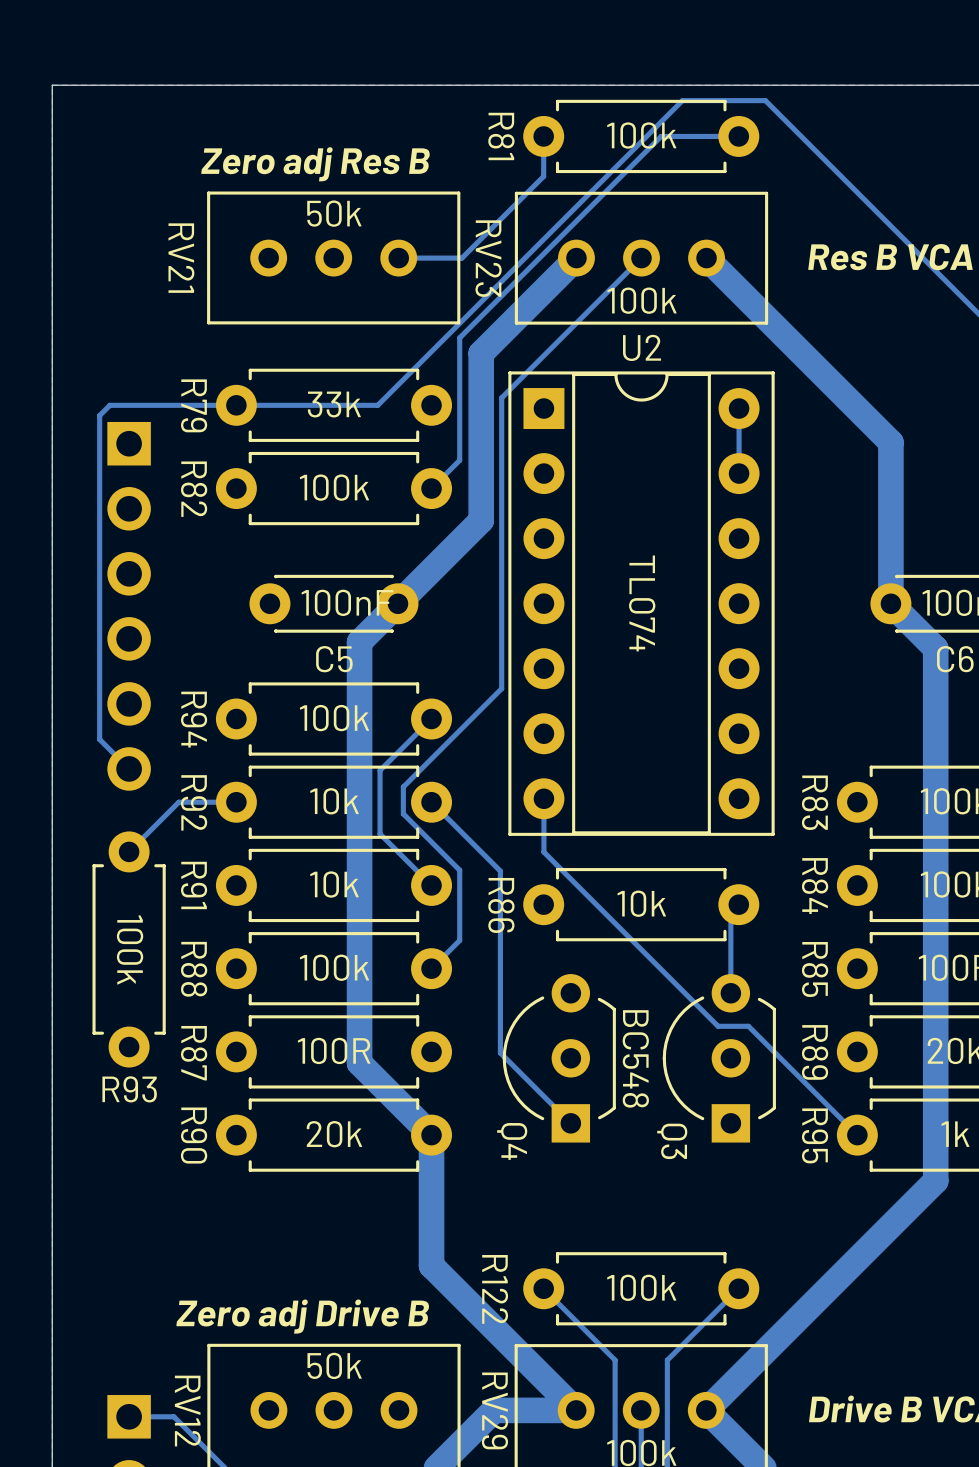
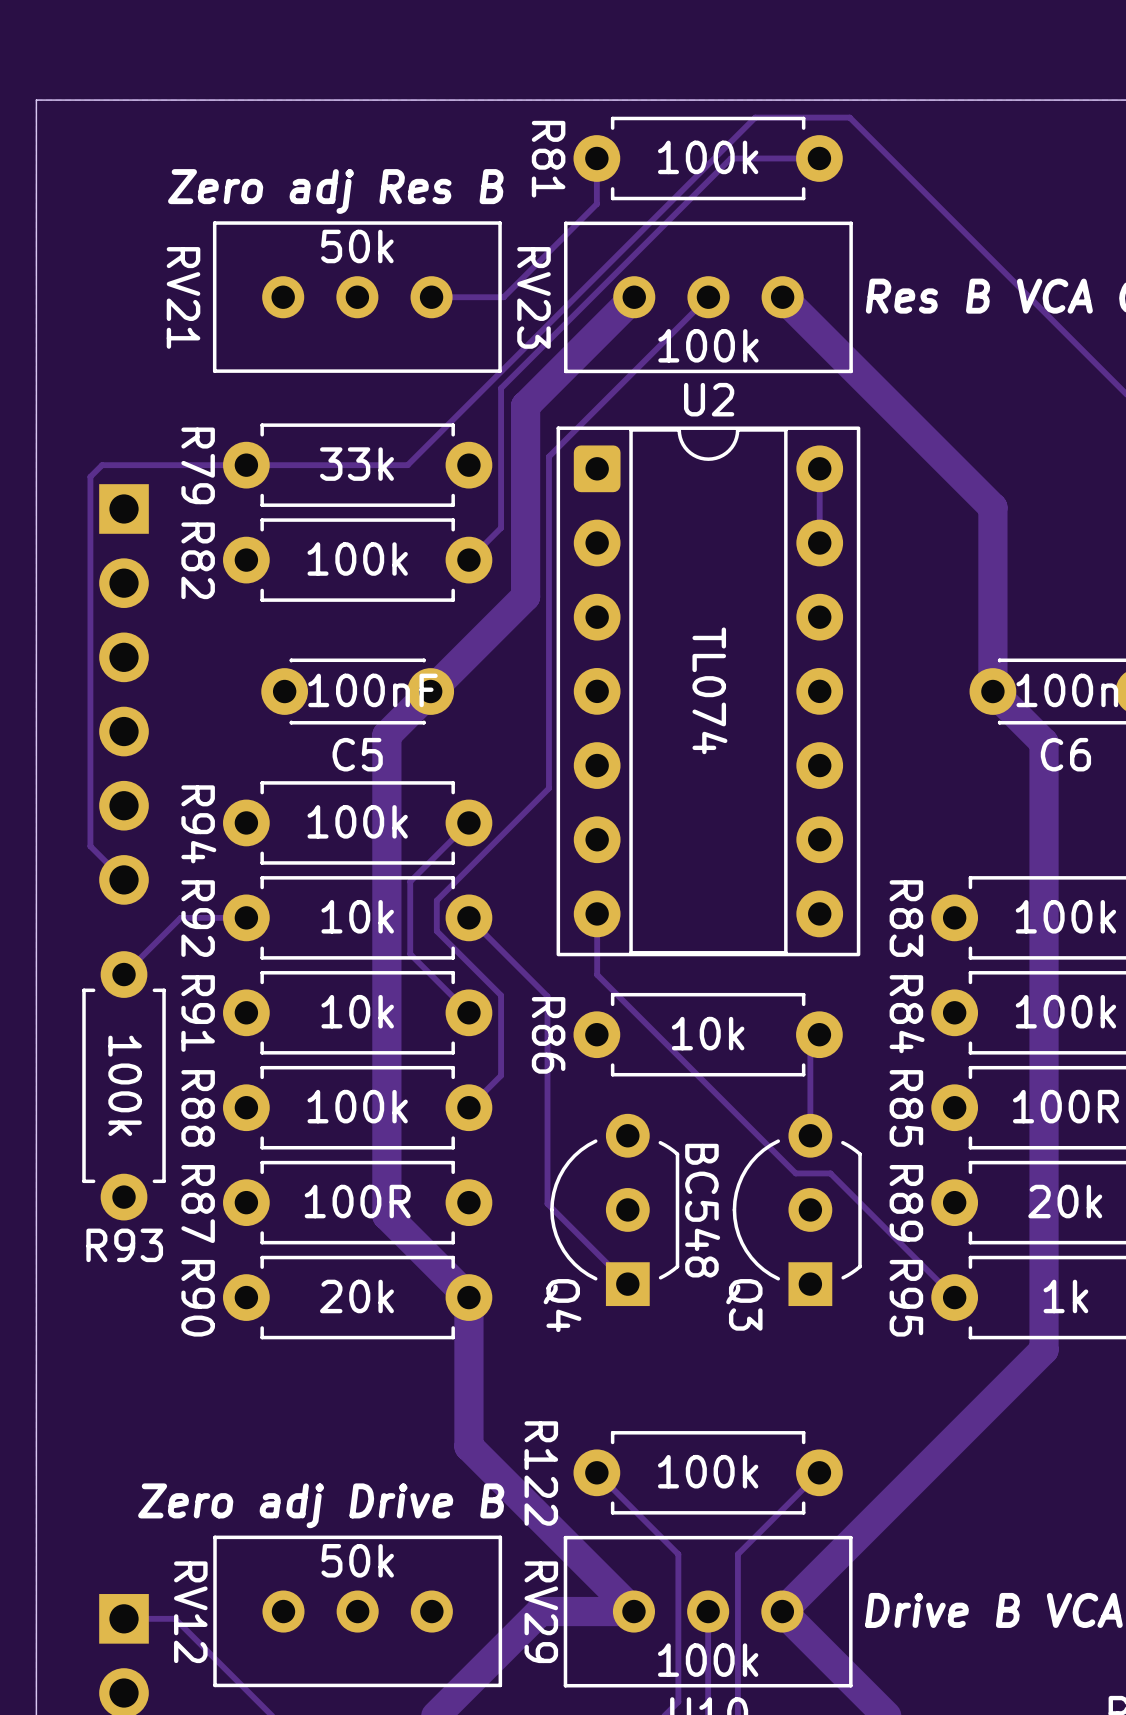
U2 footprint: [508, 371, 775, 836] -> [556, 426, 861, 957]

